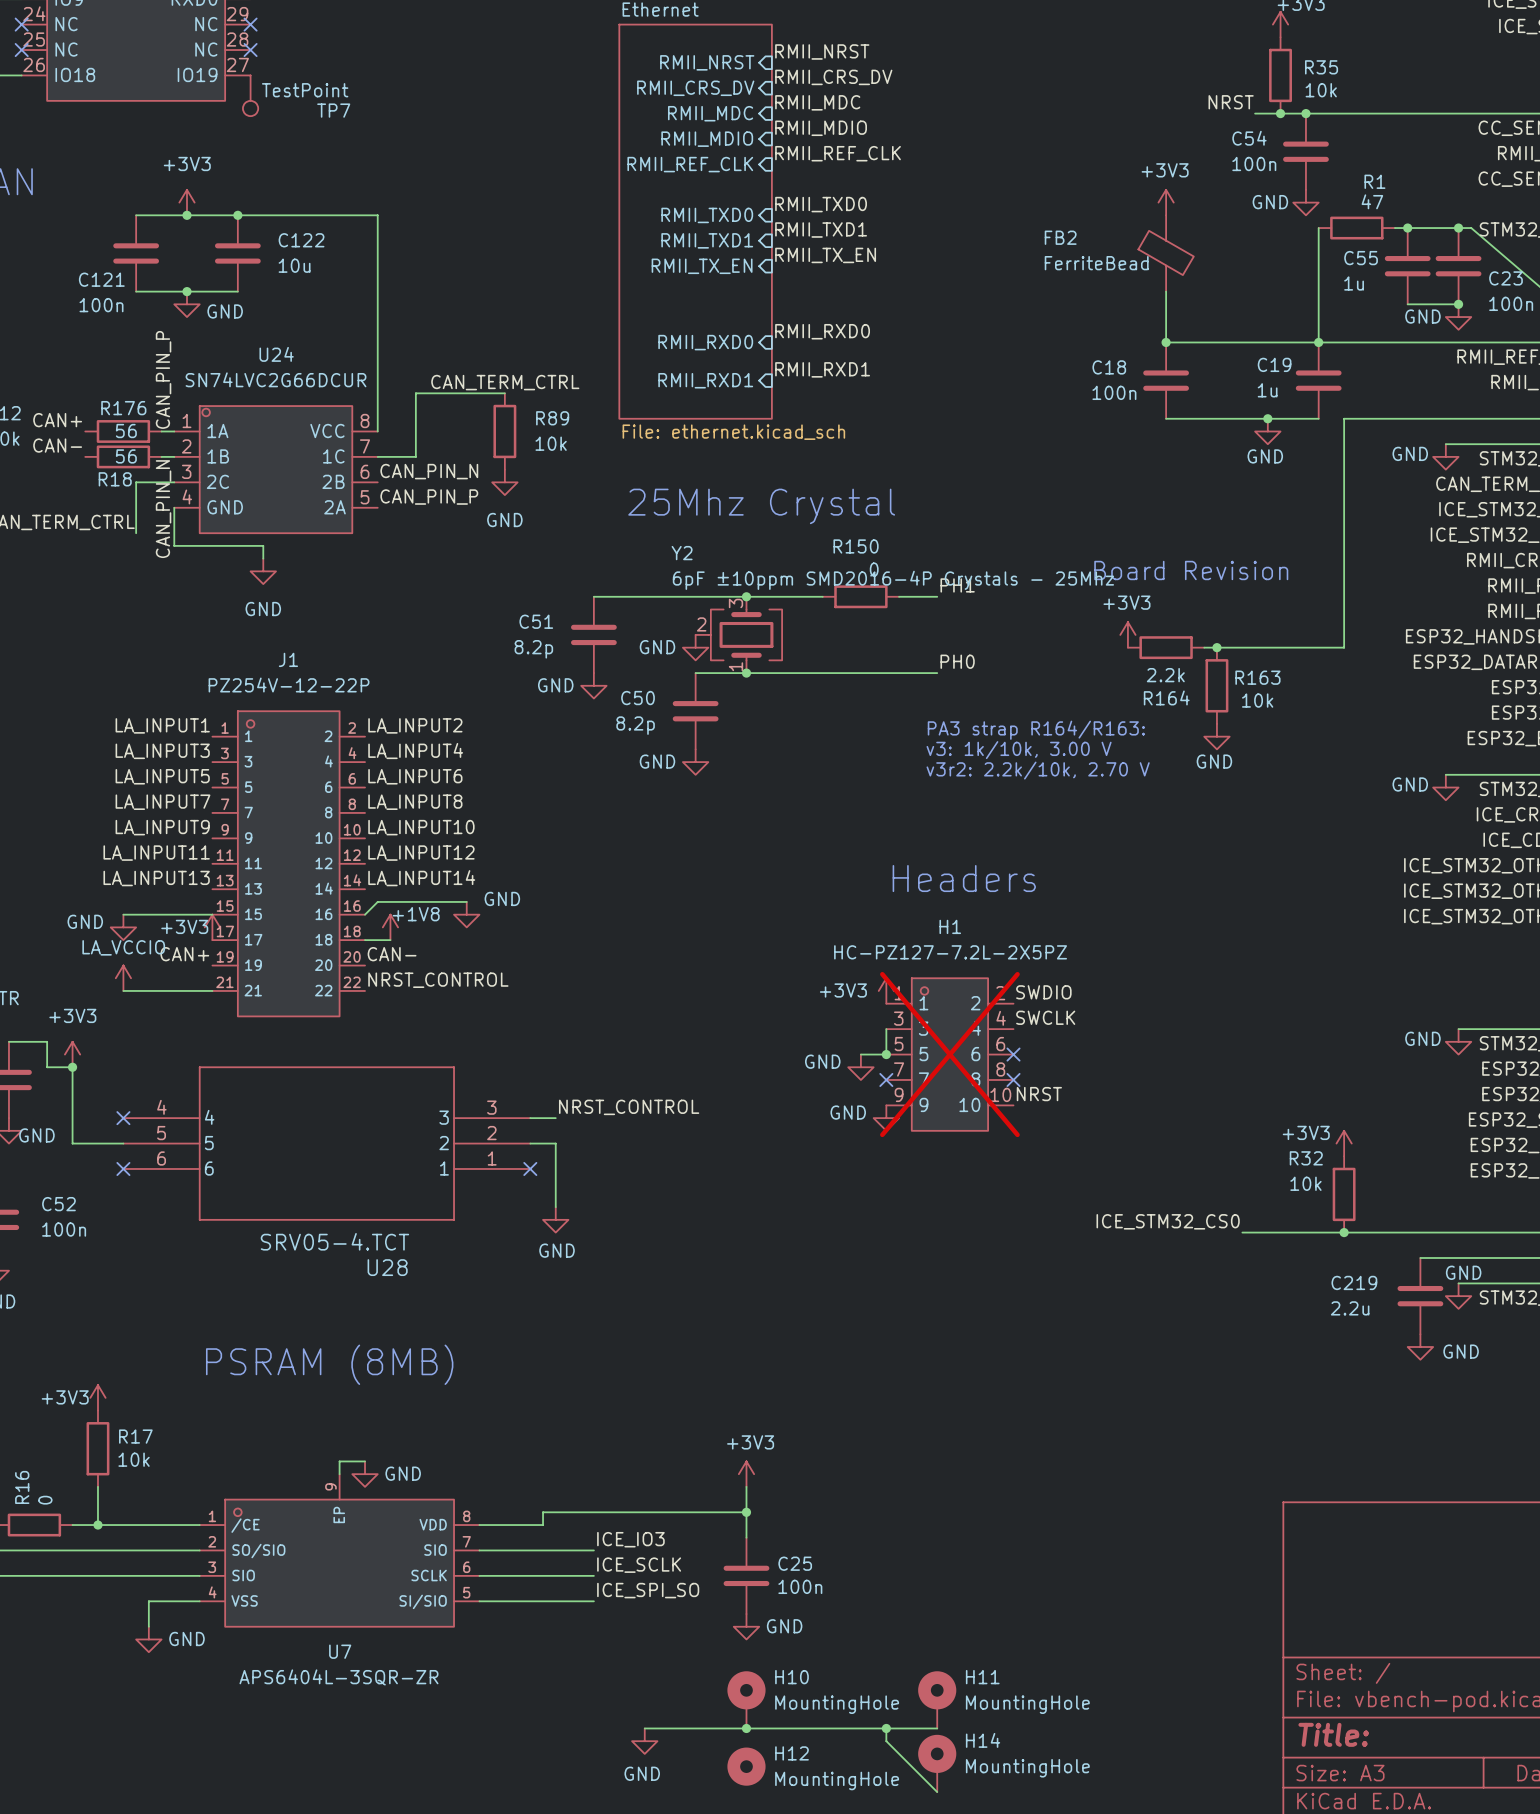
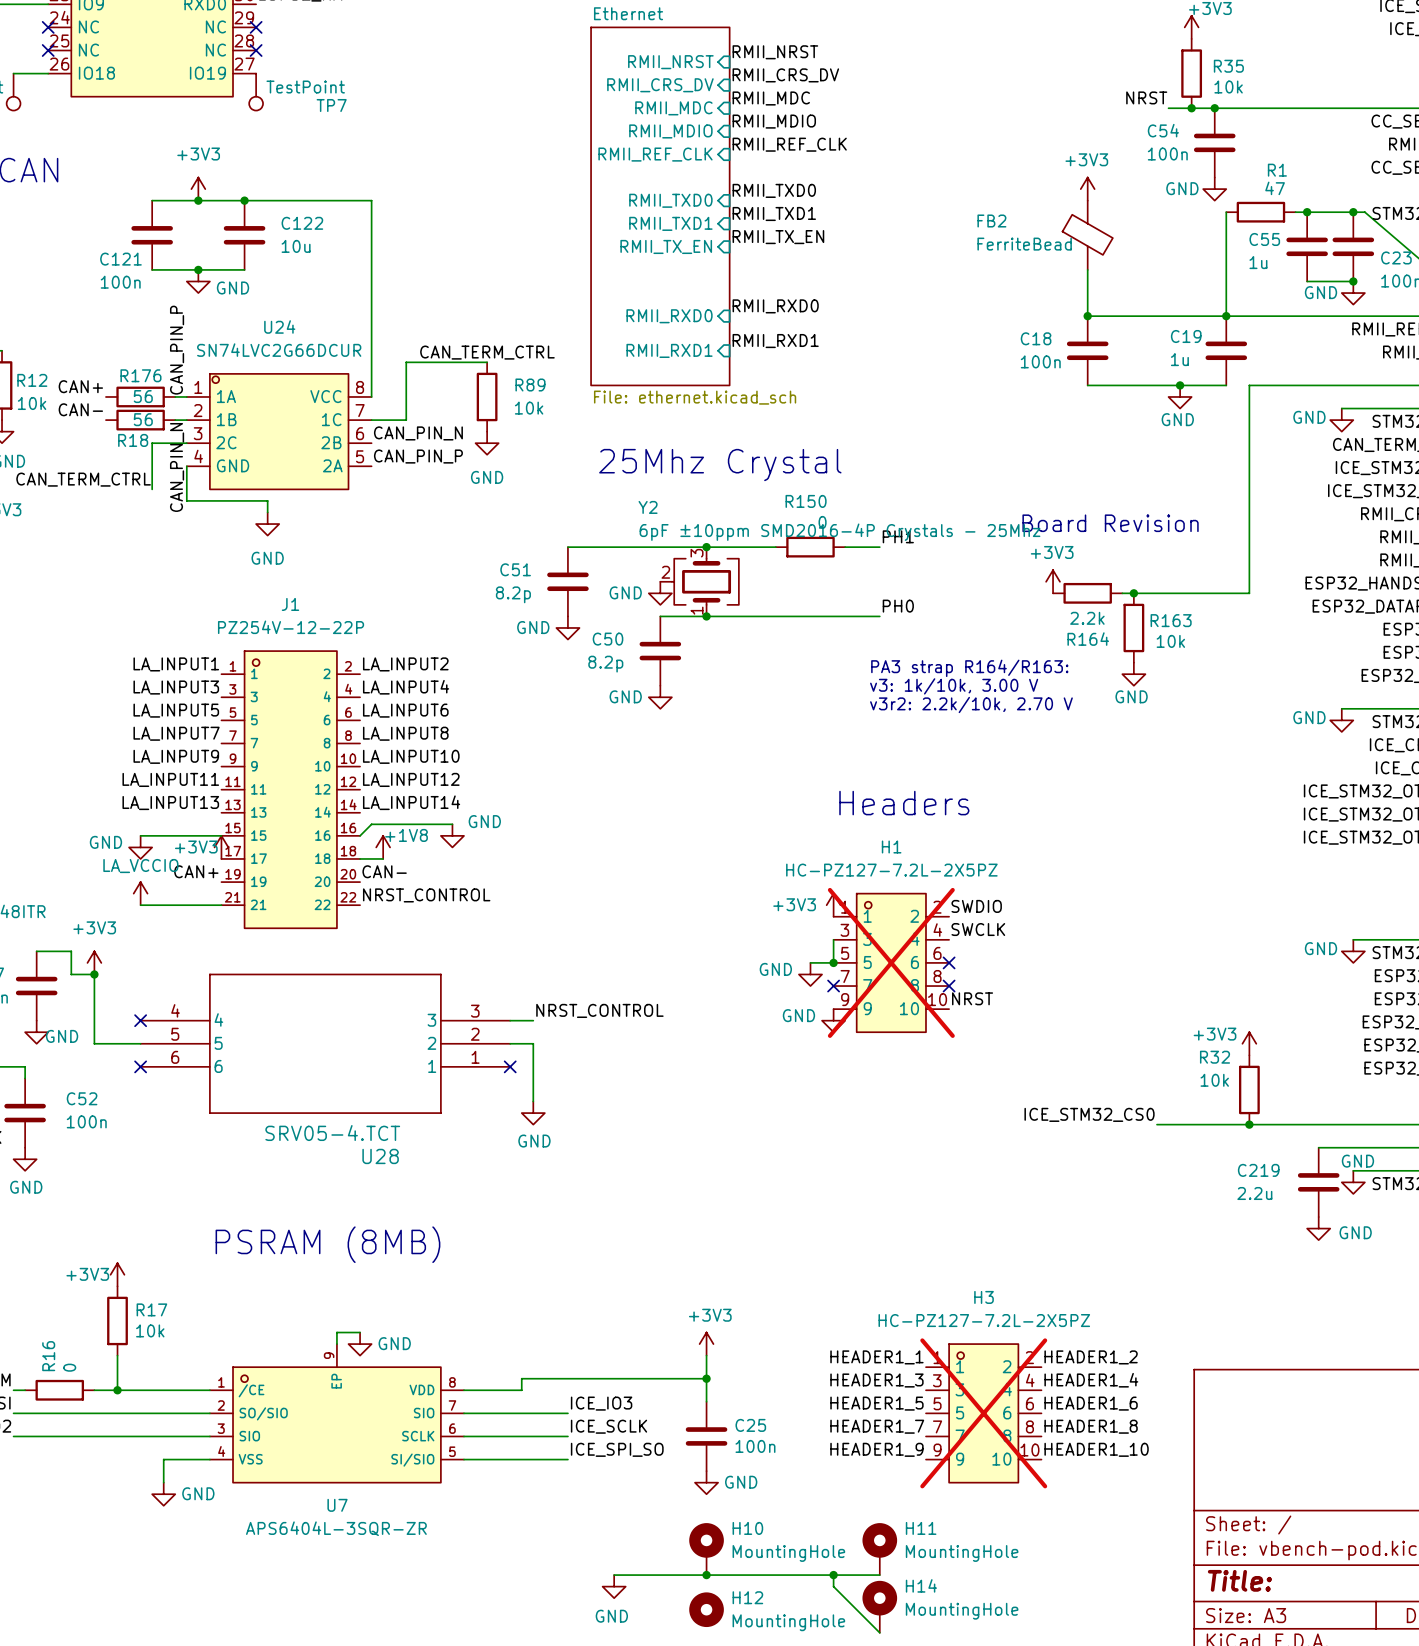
label: none -> HEADER1_1 (876, 1357)
label: none -> HEADER1_2 (1091, 1357)
label: none -> HEADER1_4 (1091, 1380)
label: none -> HEADER1_3 (876, 1380)
label: none -> HEADER1_5 (876, 1403)
label: none -> HEADER1_6 (1091, 1403)
H3: none -> HC-PZ127-7.2L-2X5PZ (983, 1413)
label: none -> HEADER1_7 (877, 1426)
label: none -> HEADER1_8 (1091, 1426)
label: none -> HEADER1_9 (876, 1449)
label: none -> HEADER1_10 (1096, 1449)

